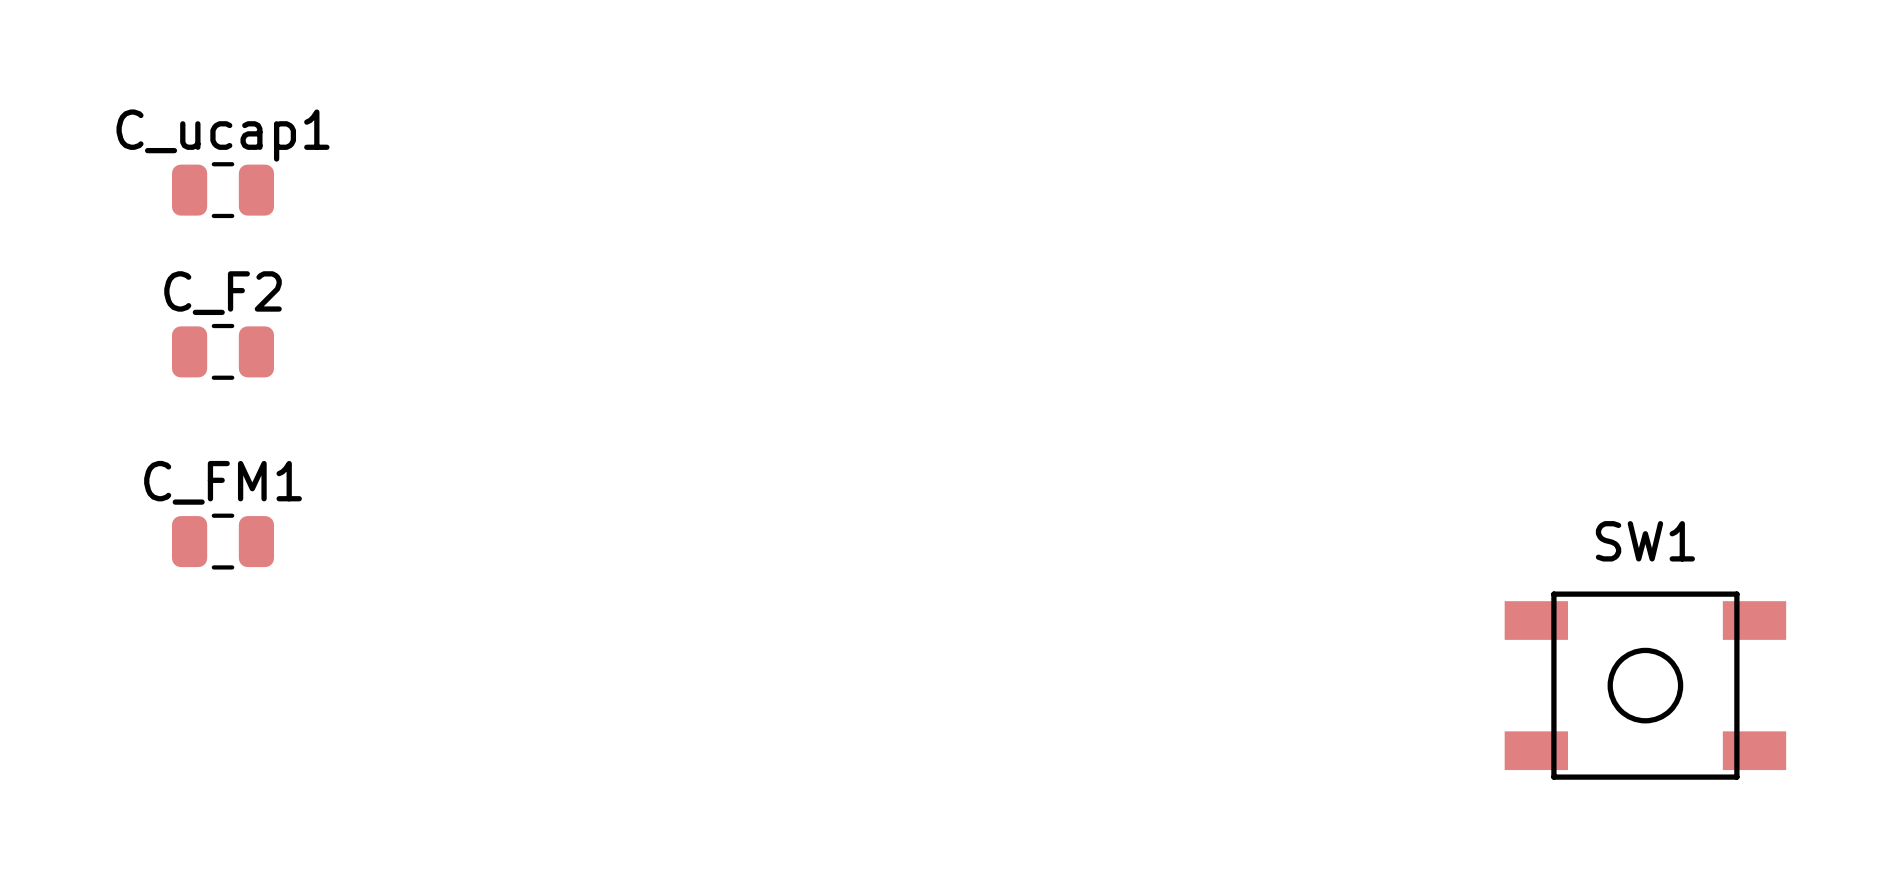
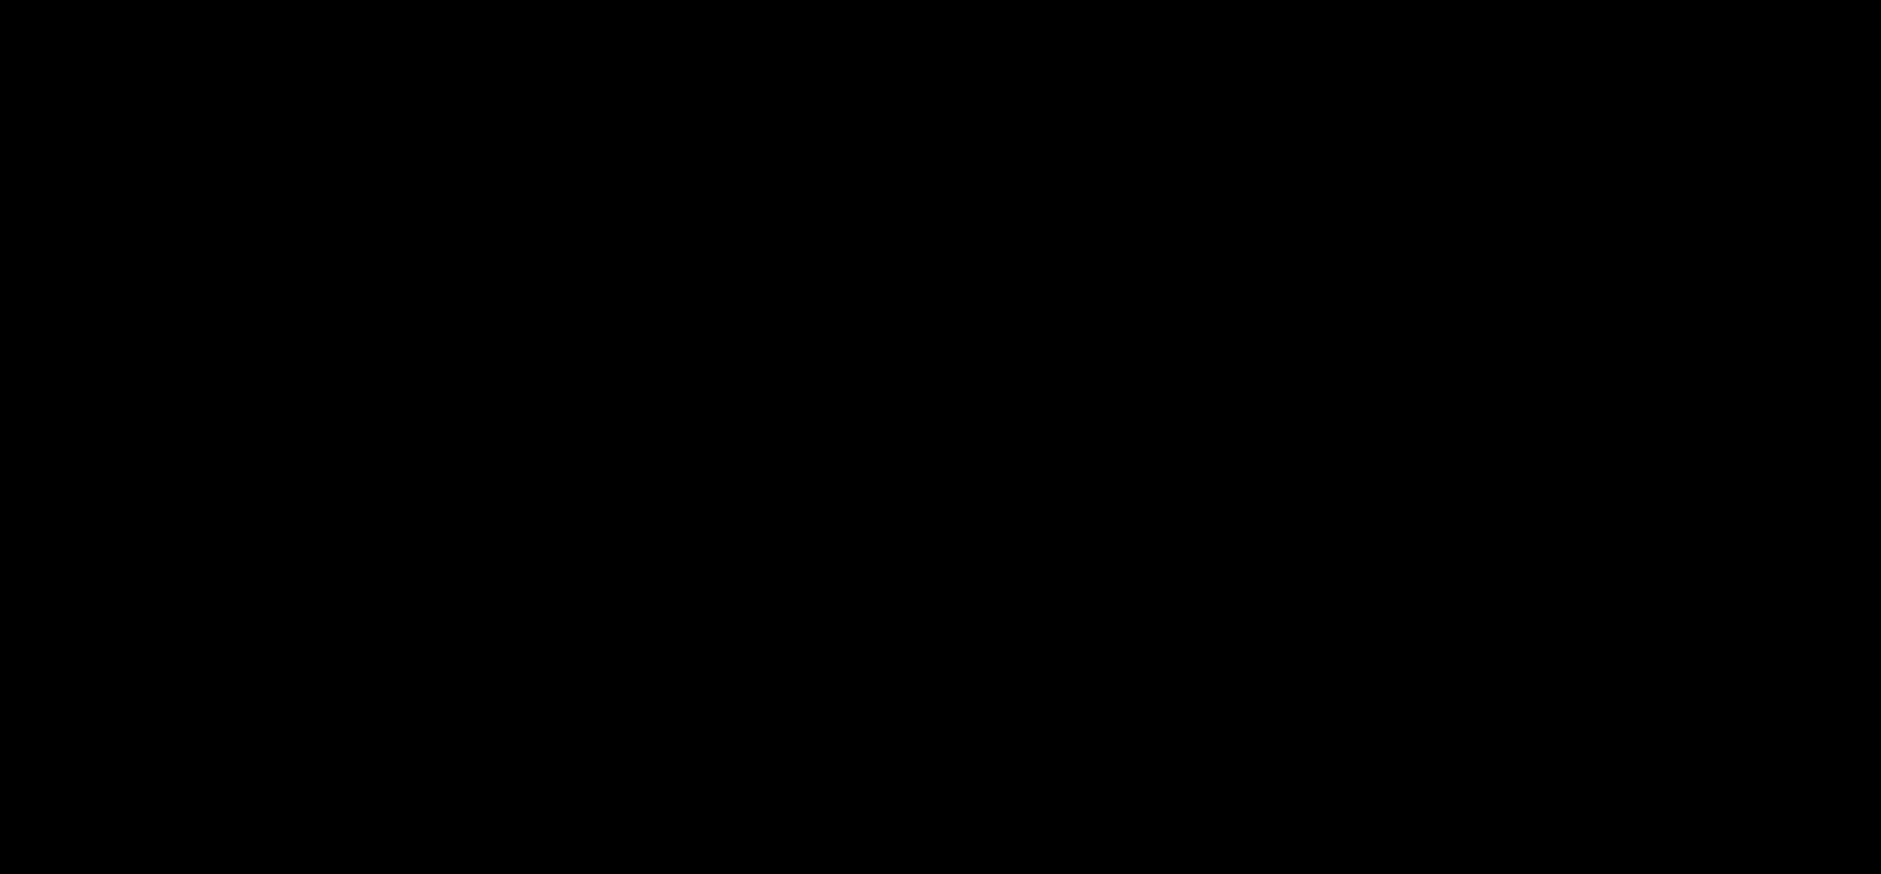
C_ucap1: (223, 190) -> none
C_F2: (223, 351) -> none
C_FM1: (223, 541) -> none
SW1: (1645, 685) -> none

